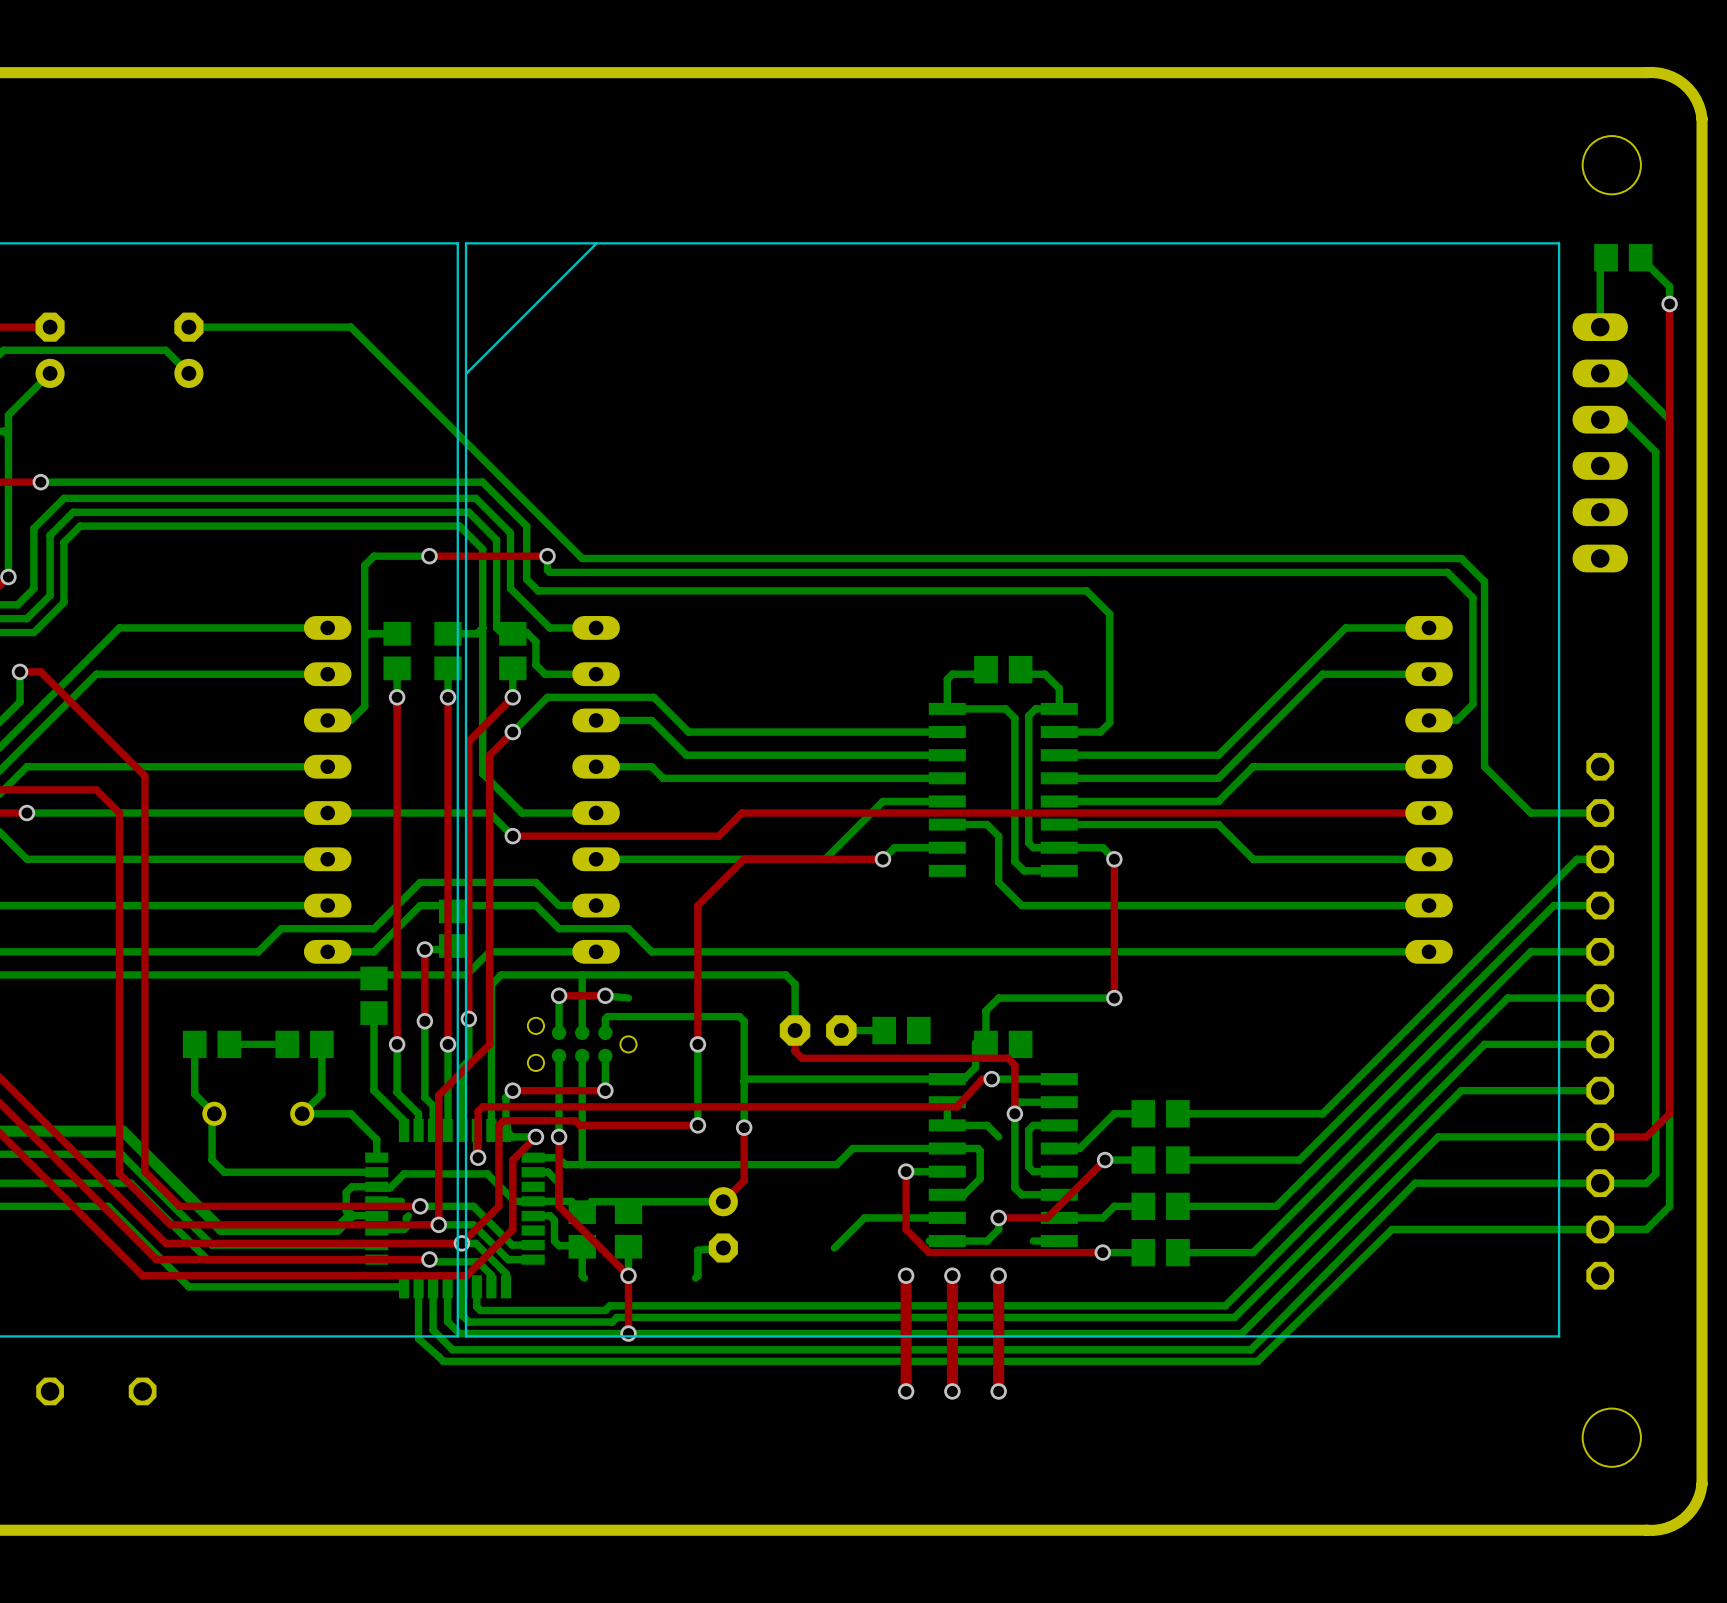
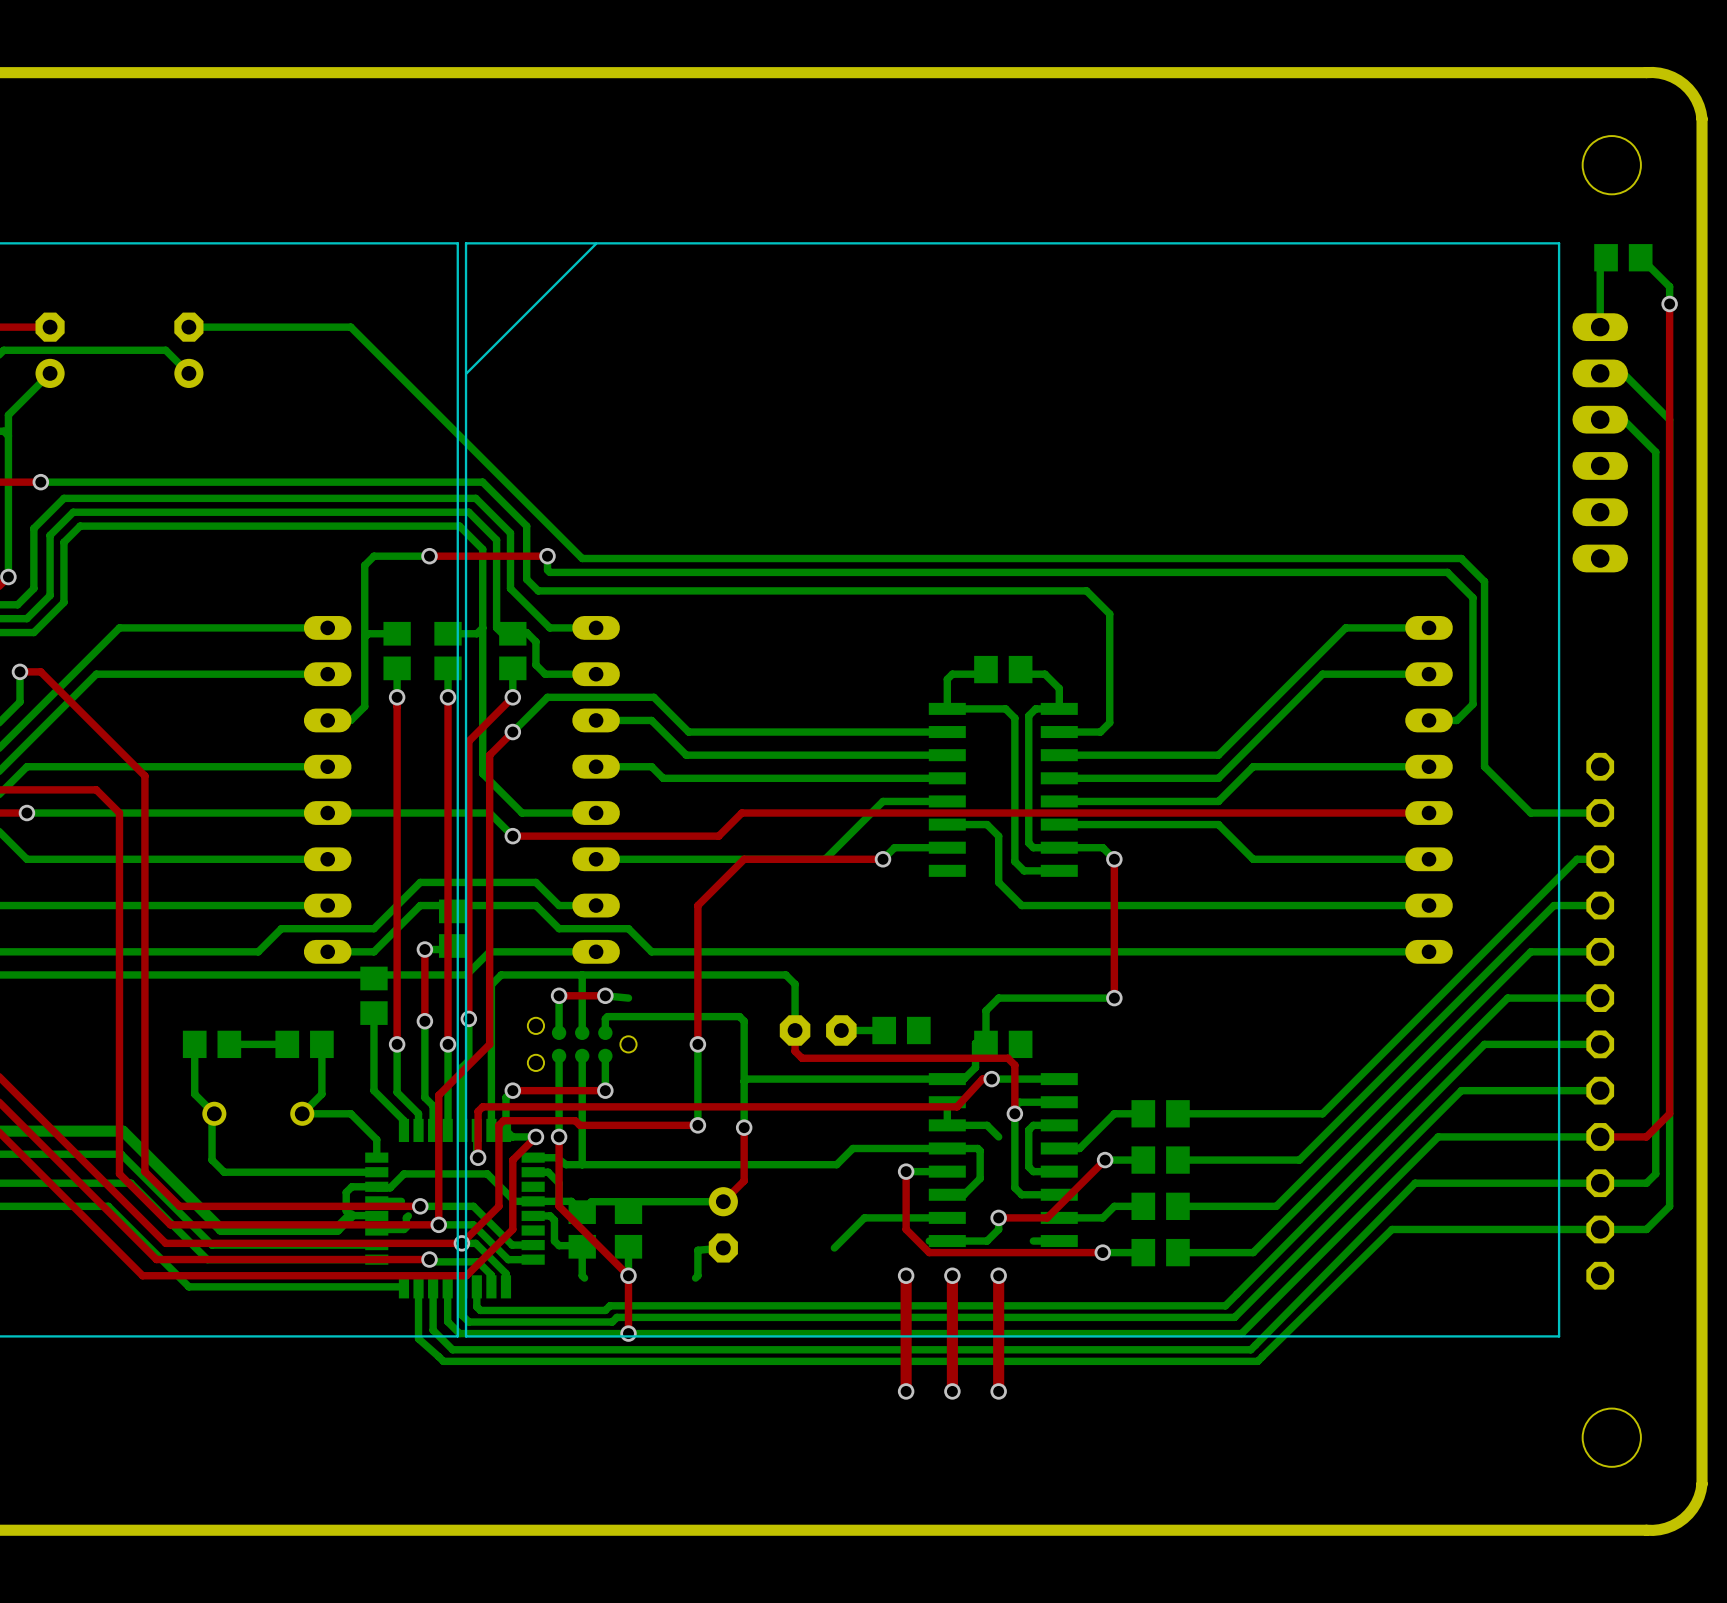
part: (50, 1391) -> none
part: (142, 1391) -> none

